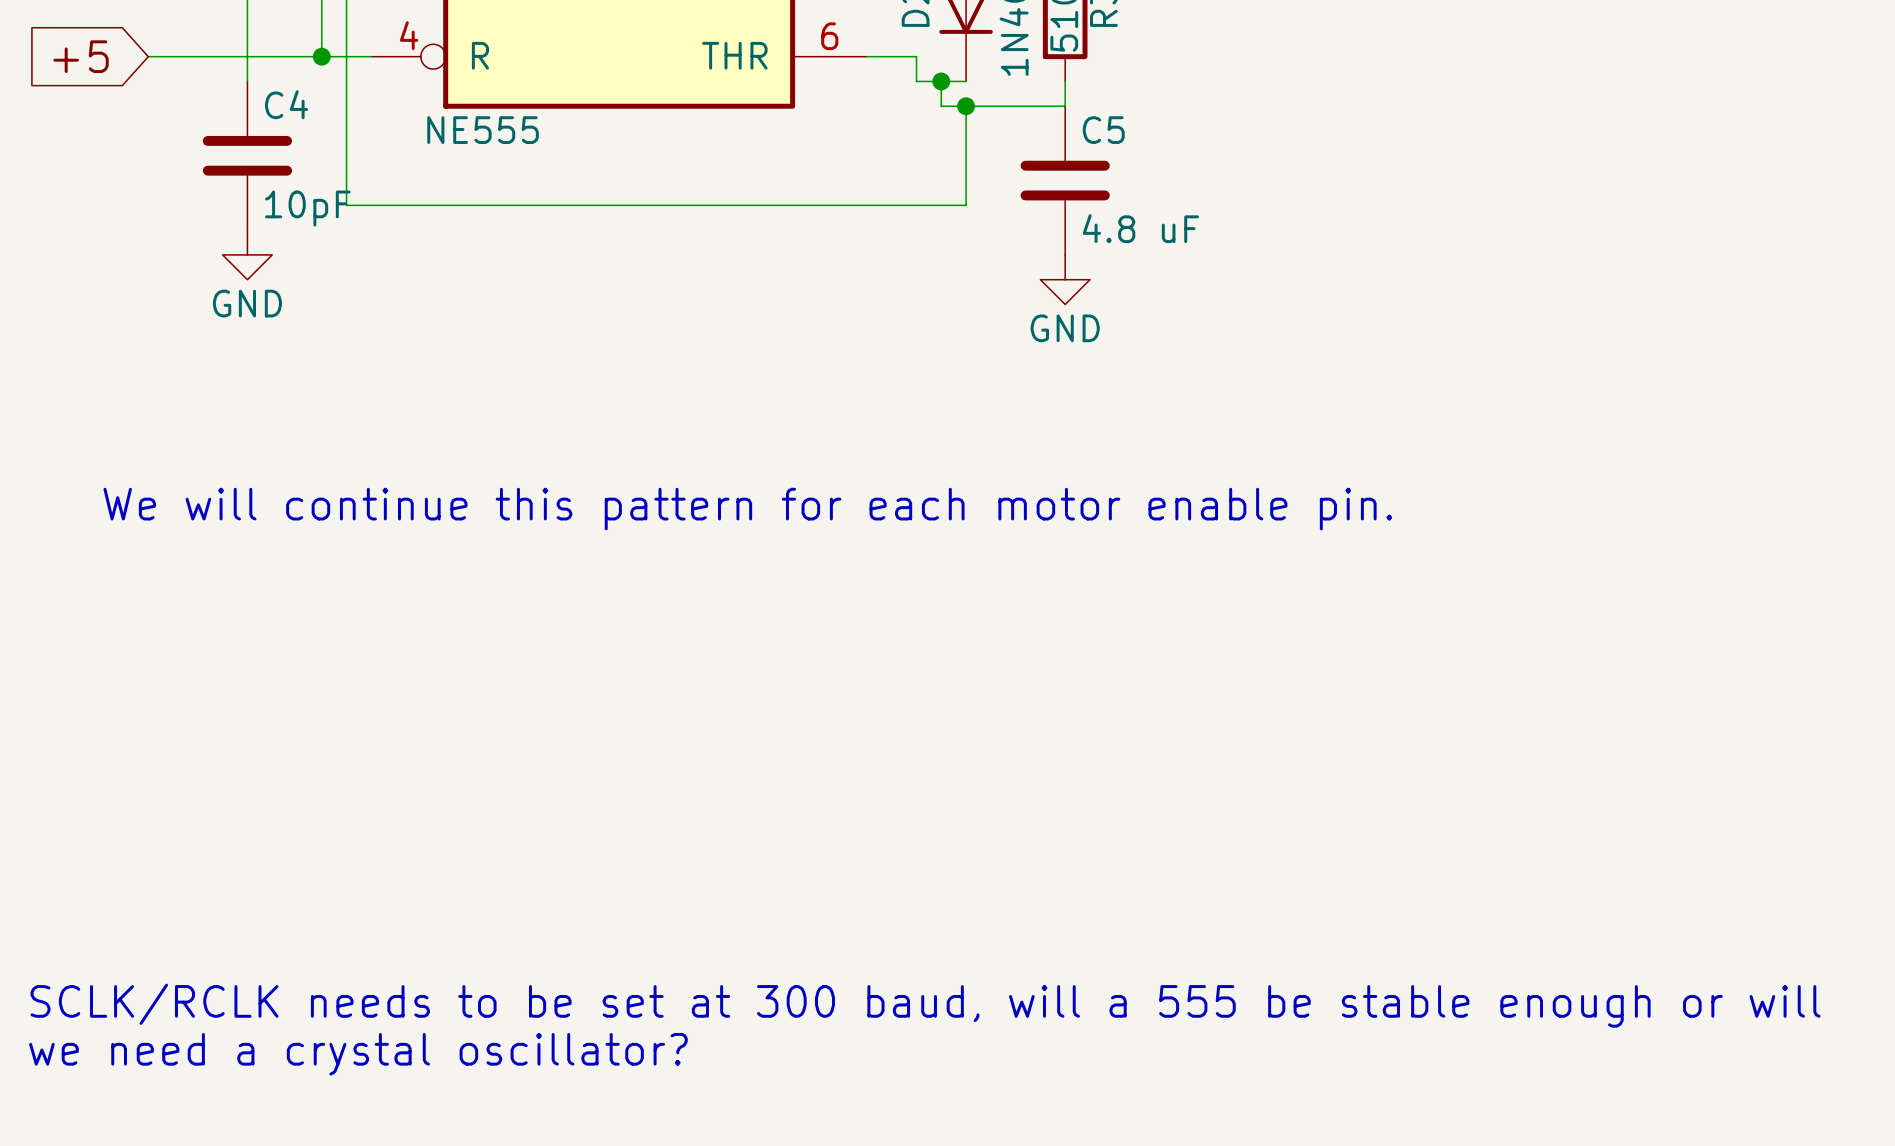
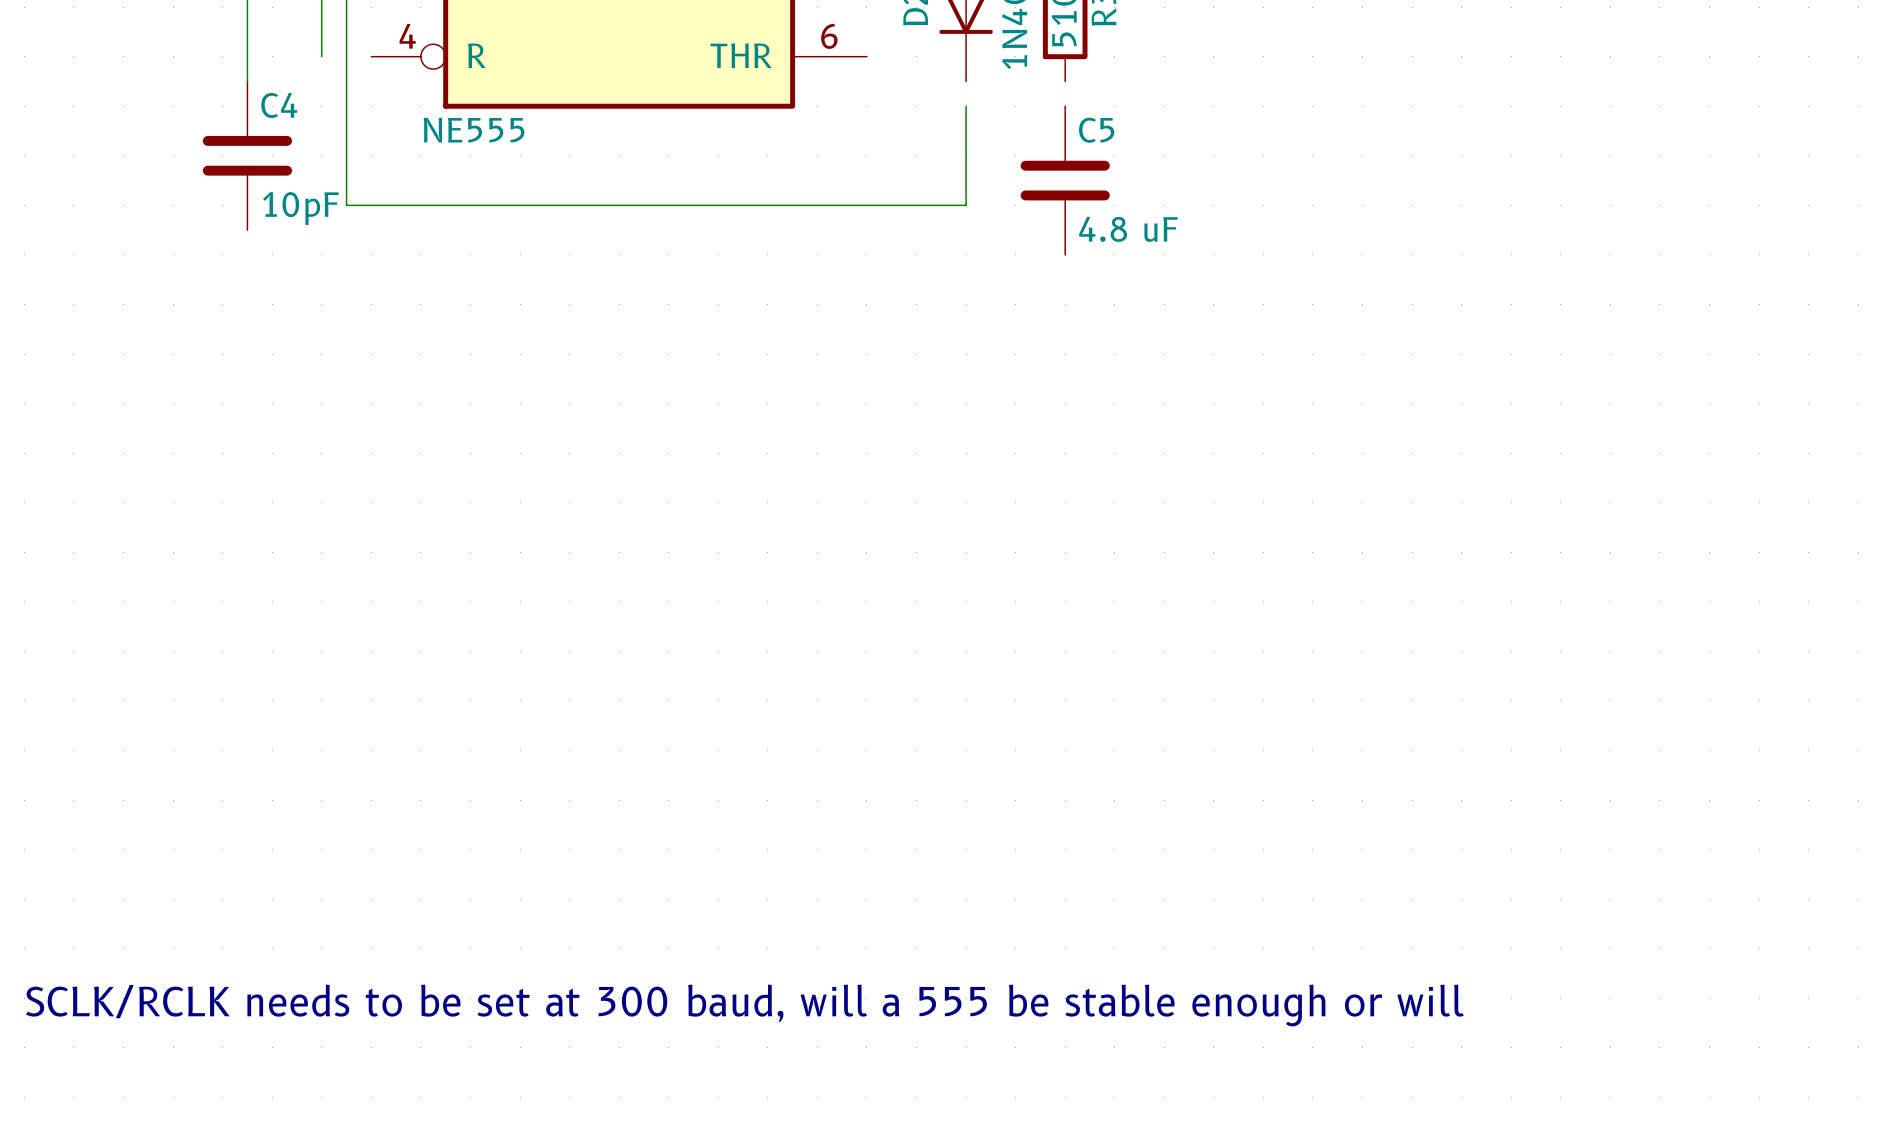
global label: +5 (81, 56) -> none
wire: (148, 56) (371, 56) -> none
junction: (321, 56) -> none
wire: (866, 56) (916, 56) (916, 81) (966, 81) -> none
wire: (941, 81) (941, 106) (1065, 106) (1065, 81) -> none
junction: (941, 81) -> none
junction: (966, 106) -> none
power symbol: GND (247, 254) -> none
power symbol: GND (1065, 279) -> none
text: We will continue this pattern for each motor enable pin. (747, 509) -> none
text: we need a crystal oscillator? (358, 1054) -> none

